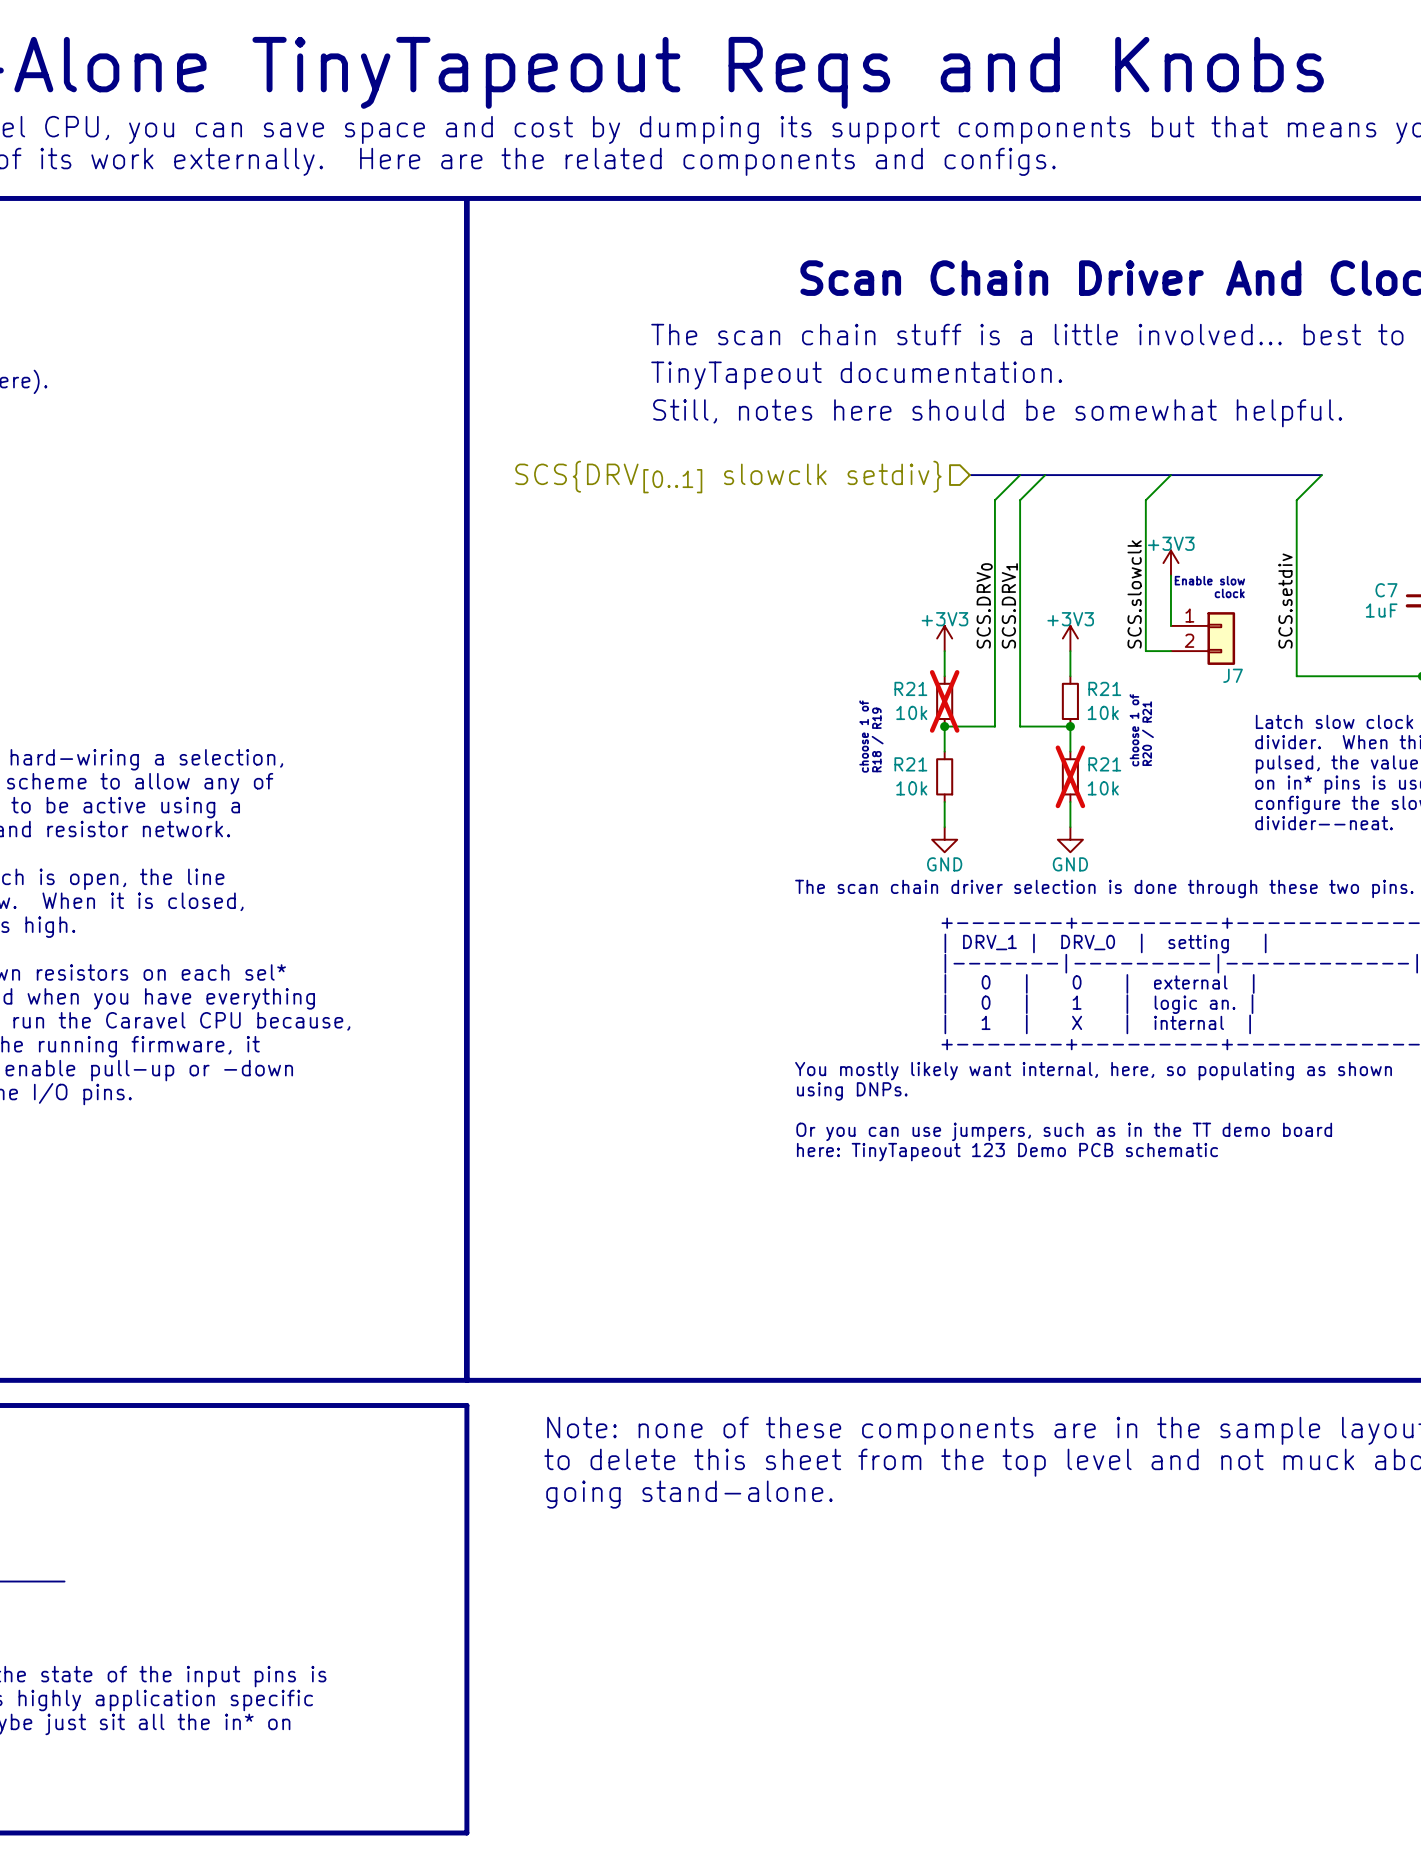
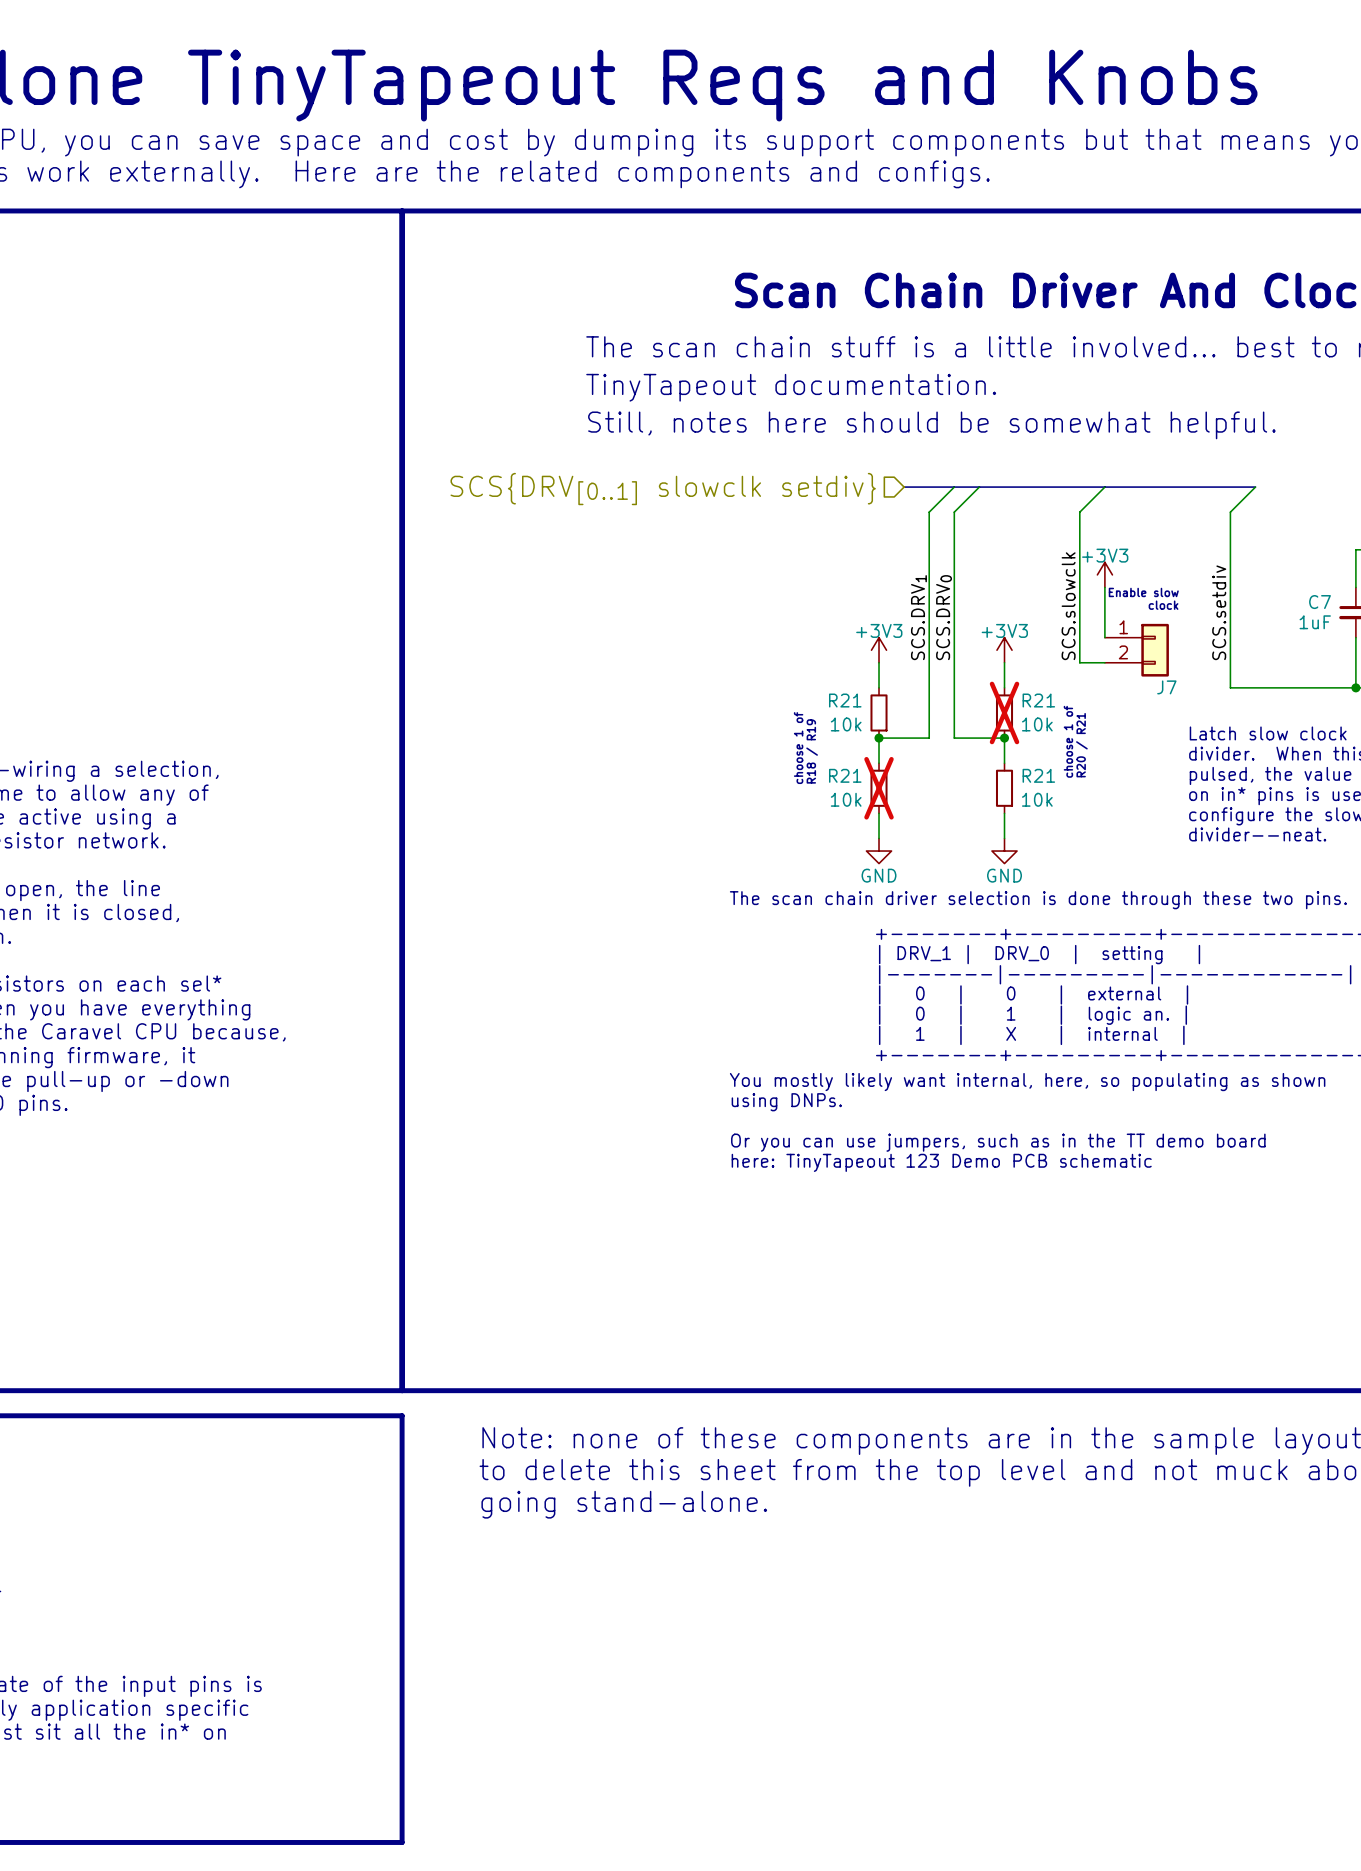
label: SCS.DRV0 (984, 605) -> SCS.DRV1 (918, 617)
label: SCS.DRV1 (1009, 605) -> SCS.DRV0 (944, 617)
R21 do-not-place cross: (944, 701) -> none
R21 do-not-place cross: none -> (1004, 712)
R21 do-not-place cross: none -> (879, 788)
R21 do-not-place cross: (1070, 776) -> none

